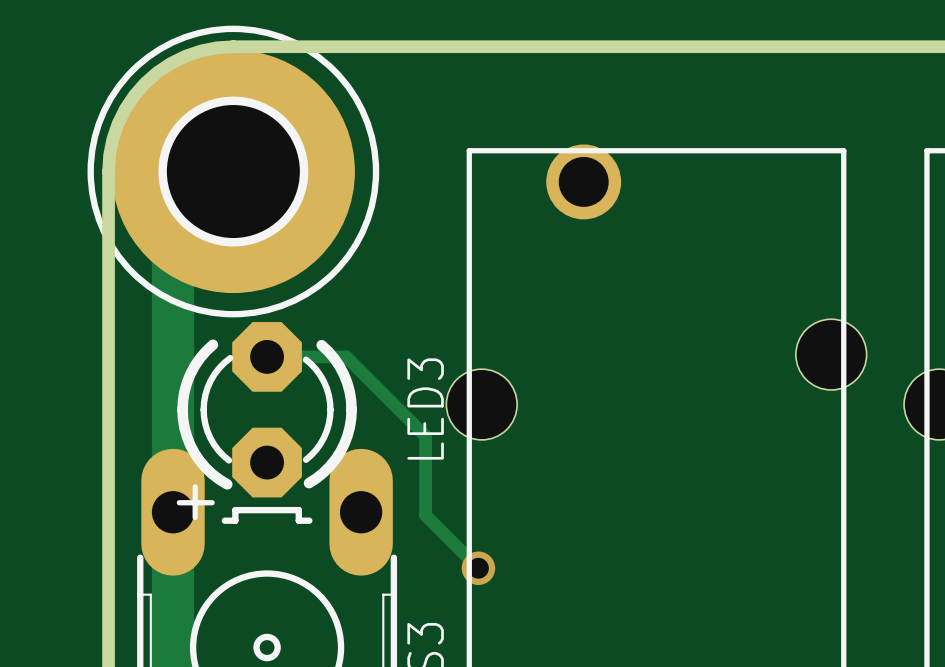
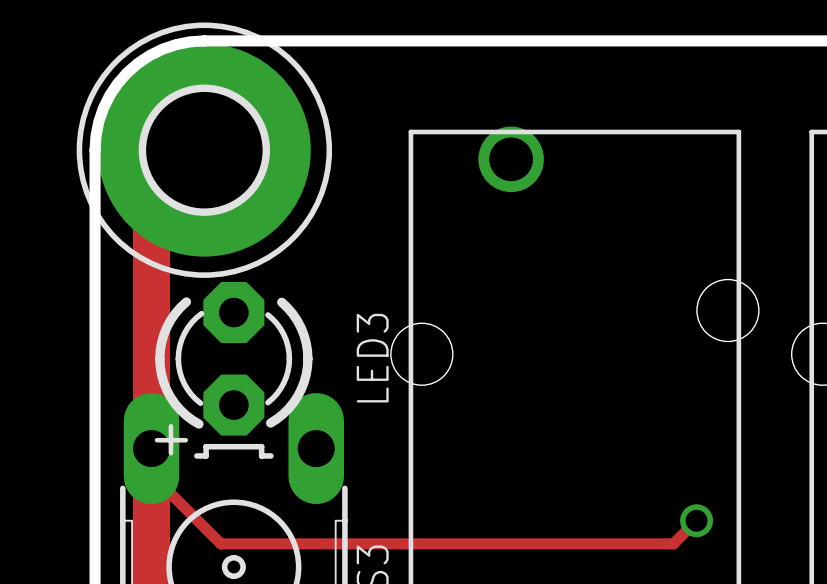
track: (267, 356) (346, 356) (425, 436) (425, 515) (478, 568) -> none
track: none -> (151, 474) (220, 543) (673, 543) (696, 520)
via: (478, 568) -> none
via: none -> (696, 520)

